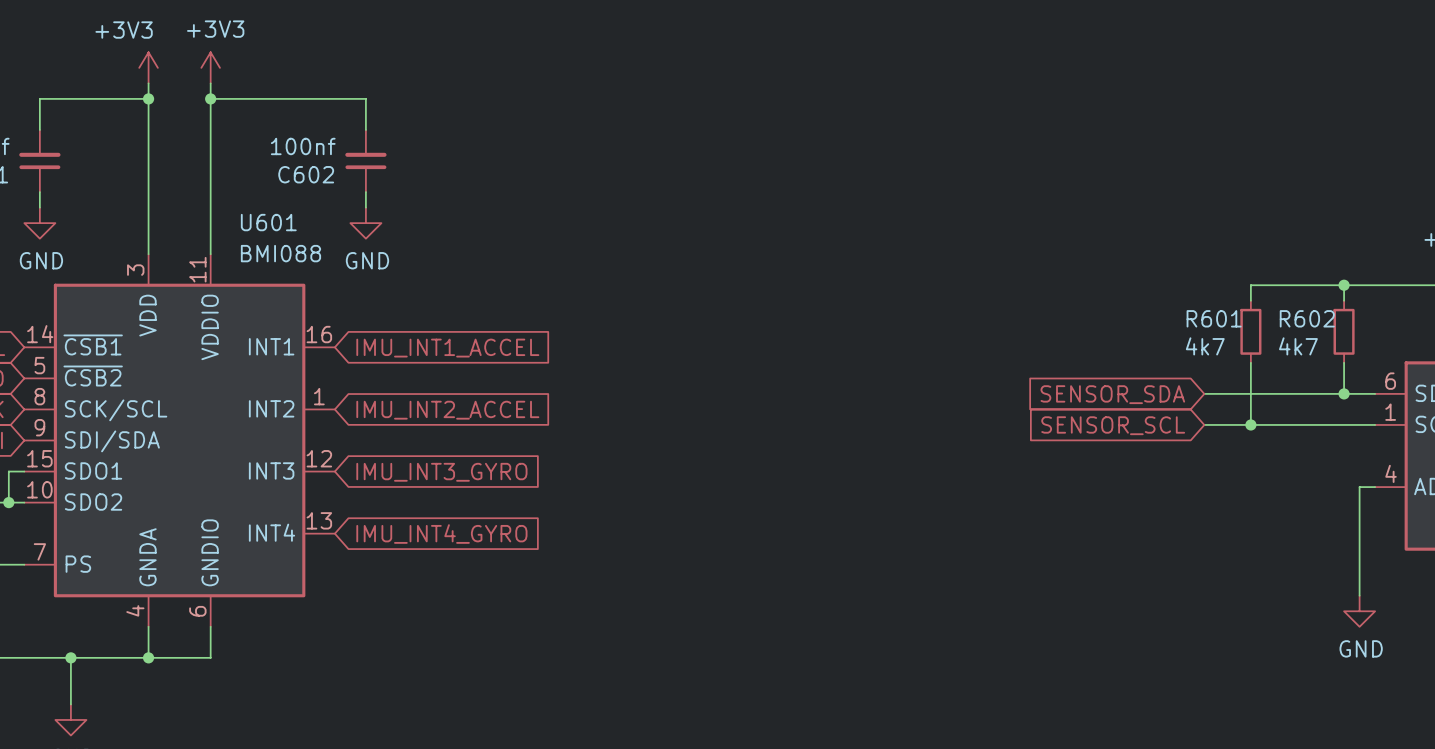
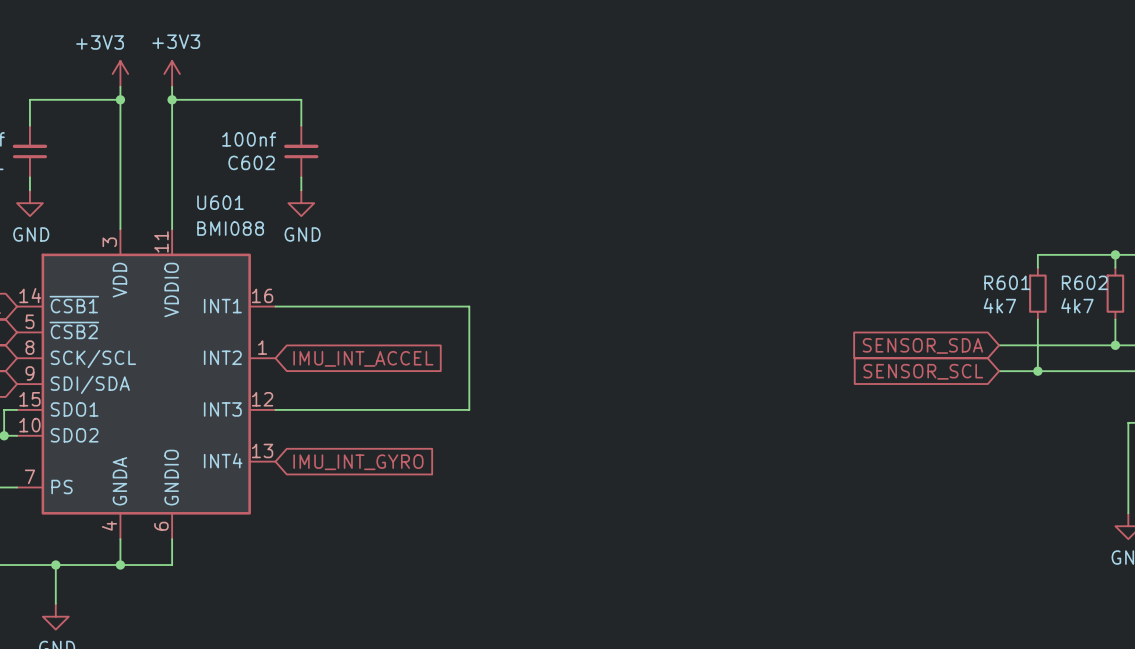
wire: none -> (275, 306) (469, 306) (469, 409) (275, 409)
global label: IMU_INT1_ACCEL (447, 348) -> none
global label: IMU_INT2_ACCEL (447, 410) -> IMU_INT_ACCEL (363, 358)
global label: IMU_INT3_GYRO (441, 472) -> none
global label: IMU_INT4_GYRO (441, 534) -> IMU_INT_GYRO (358, 462)

